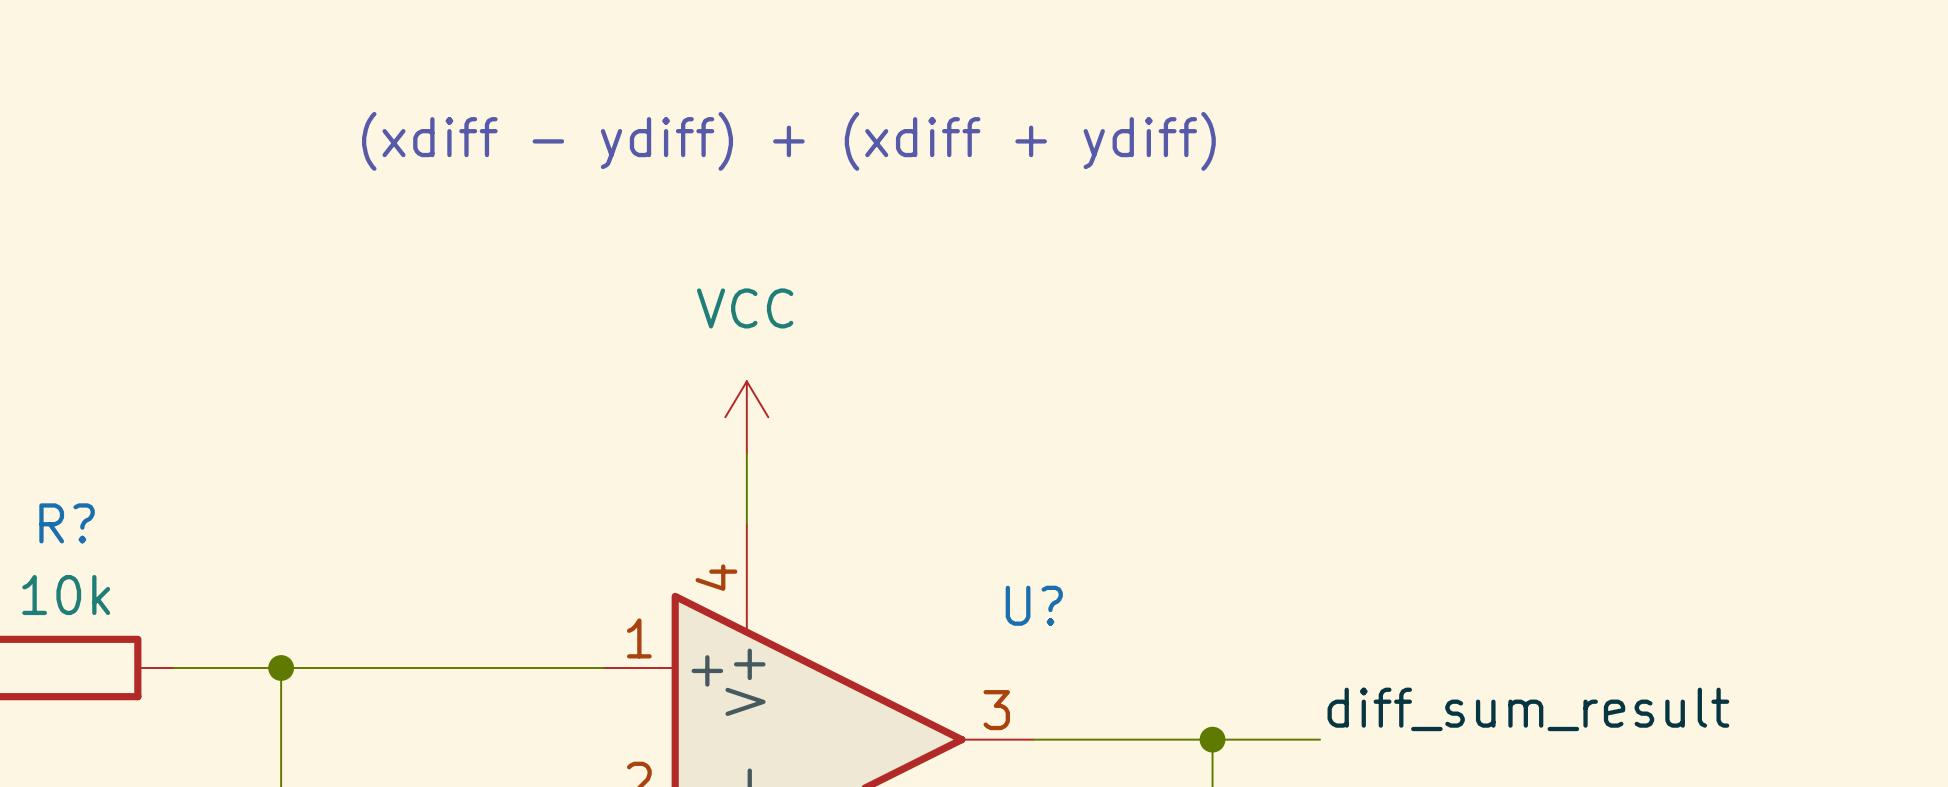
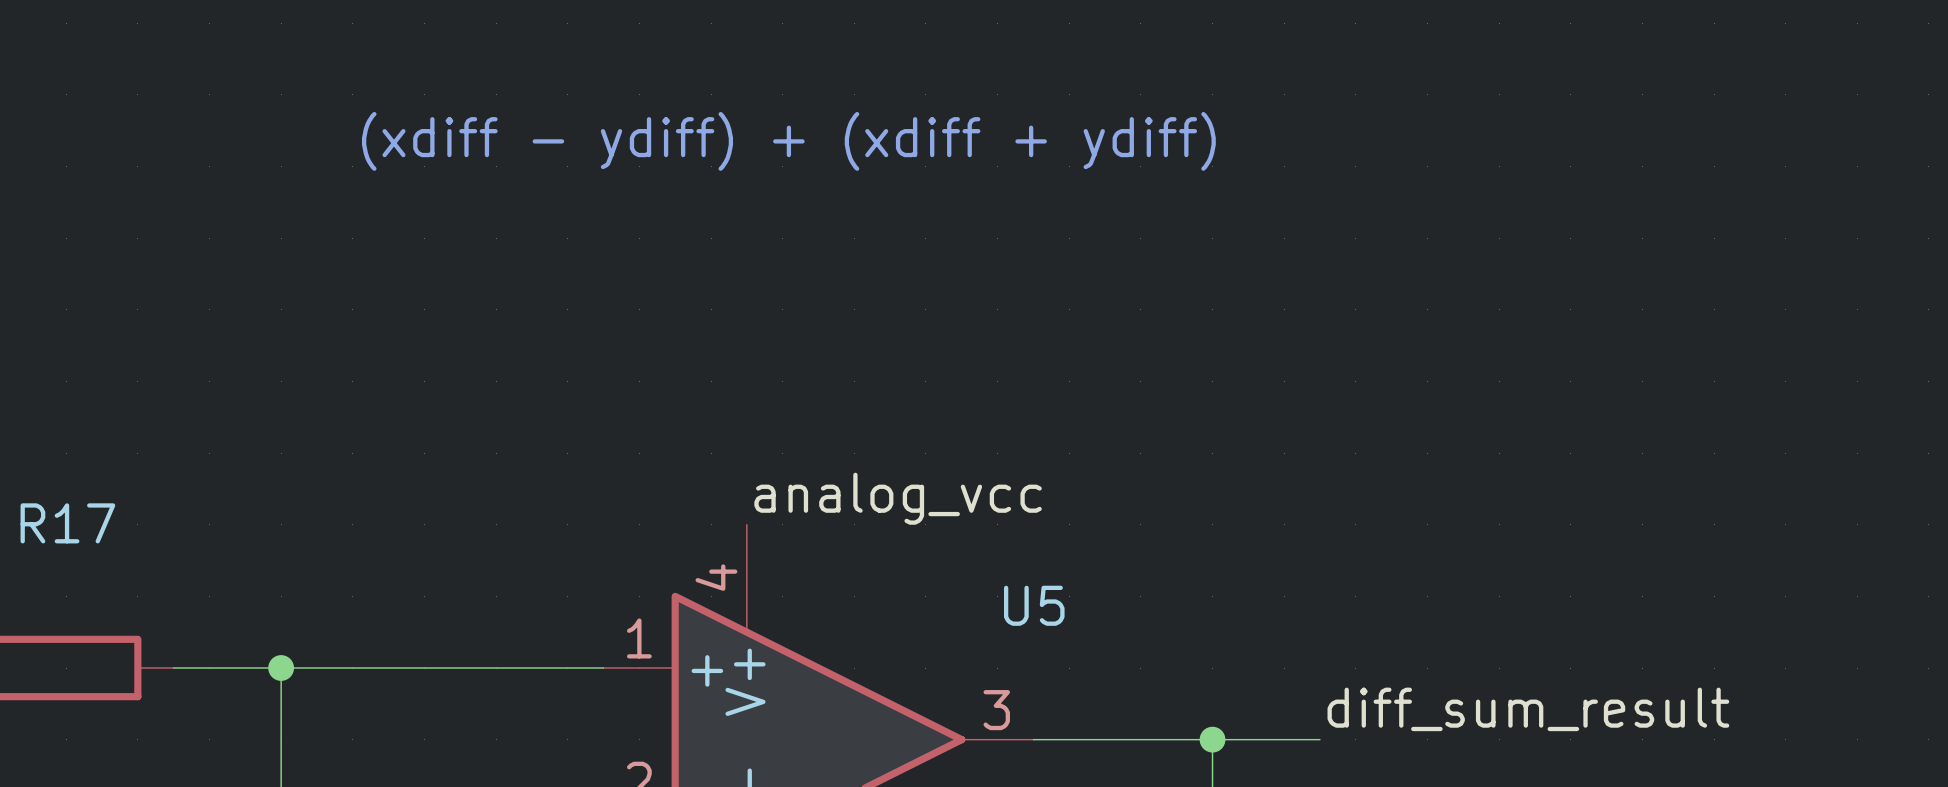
power symbol: VCC (746, 417) -> none
wire: (746, 453) (746, 524) -> none
label: none -> analog_vcc (898, 498)
R? name: R? (67, 523) -> R17 (67, 523)
R? value: 10k (66, 595) -> none
U? name: U? (1034, 605) -> U5 (1034, 605)

